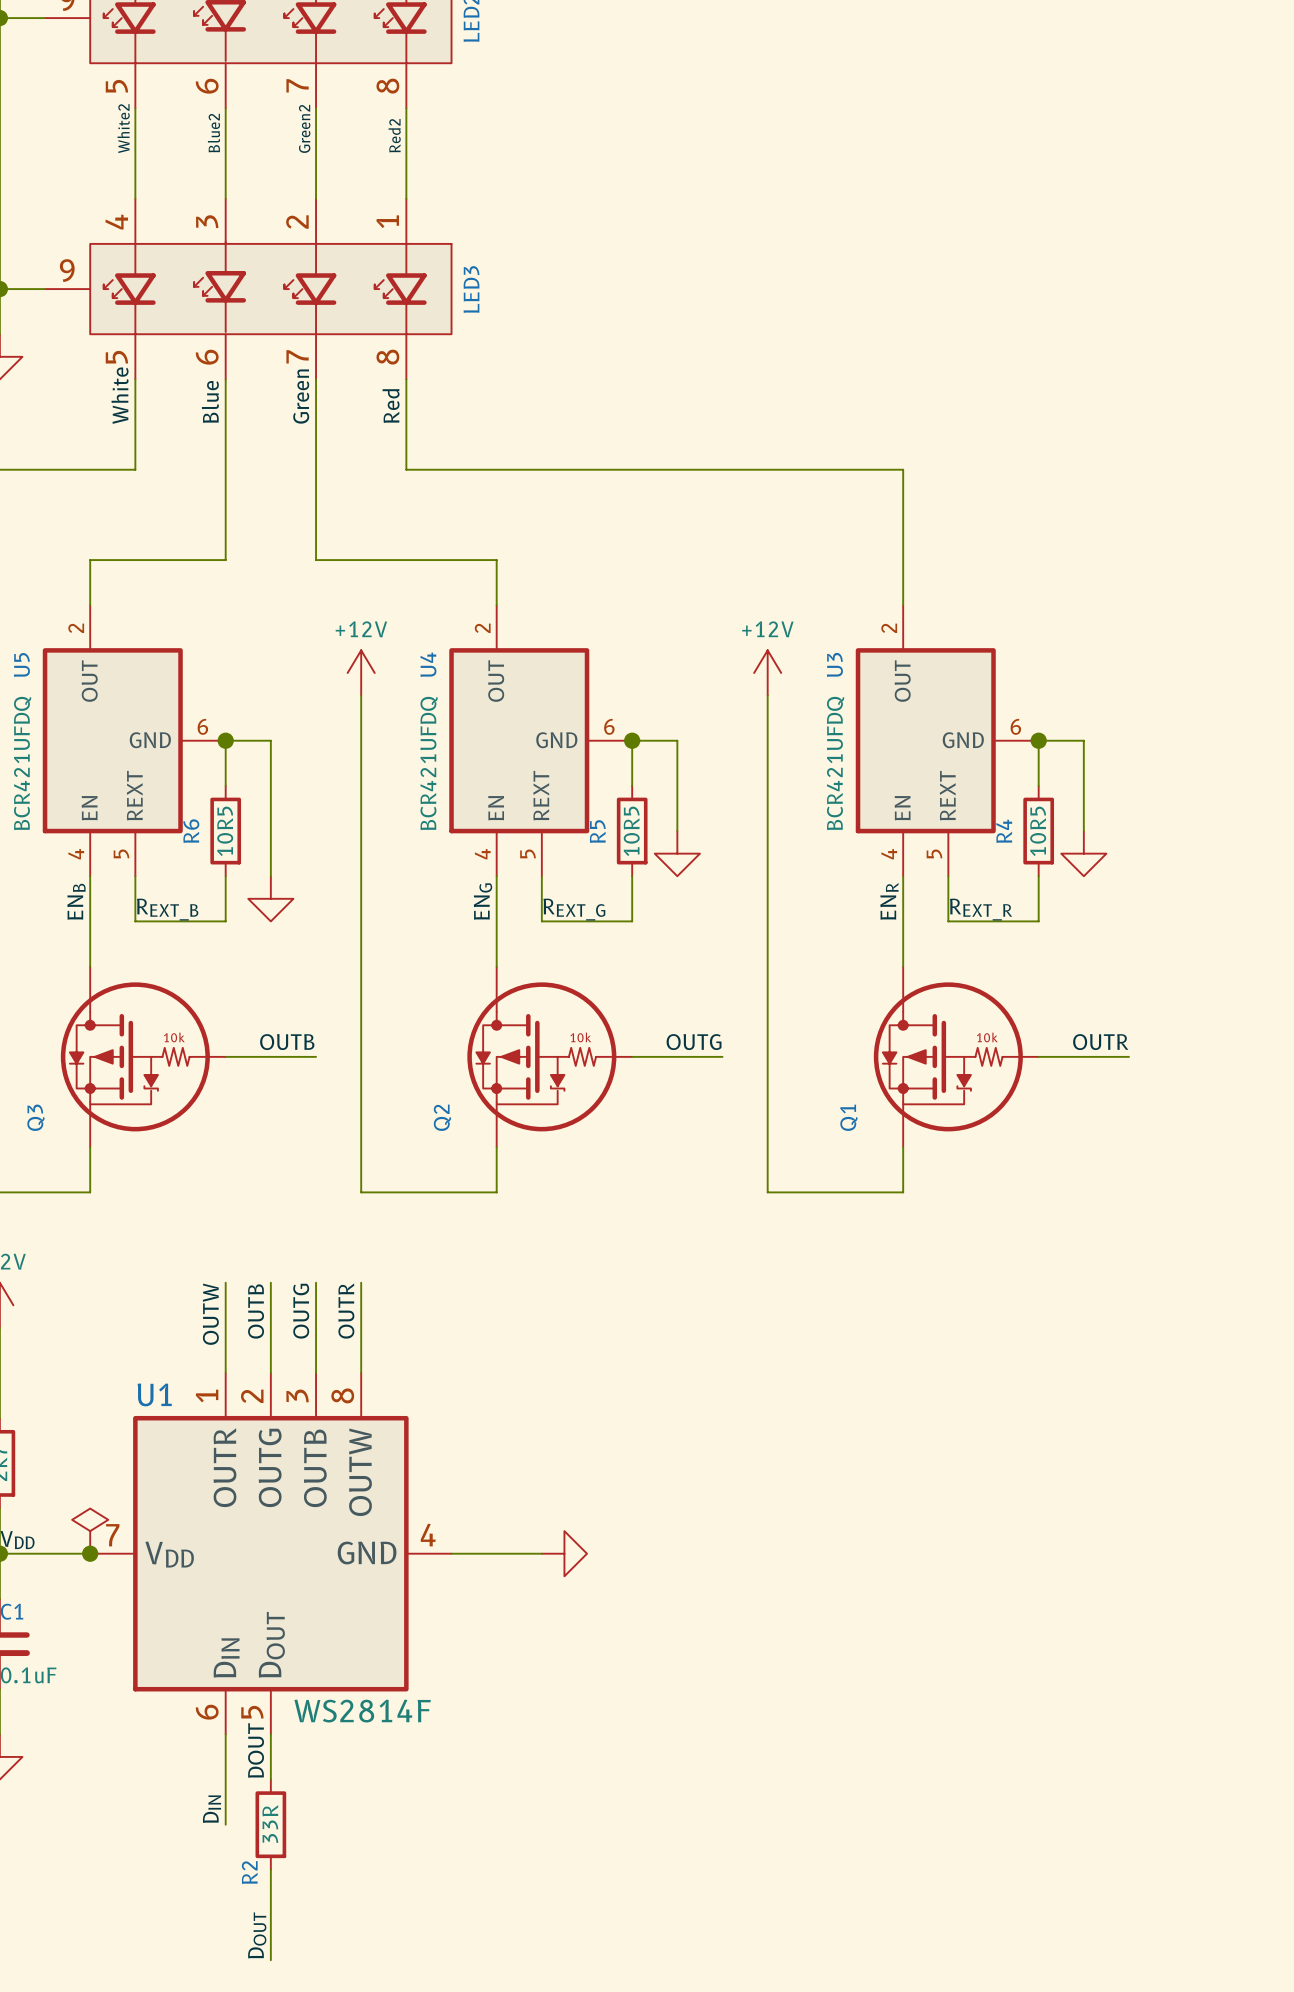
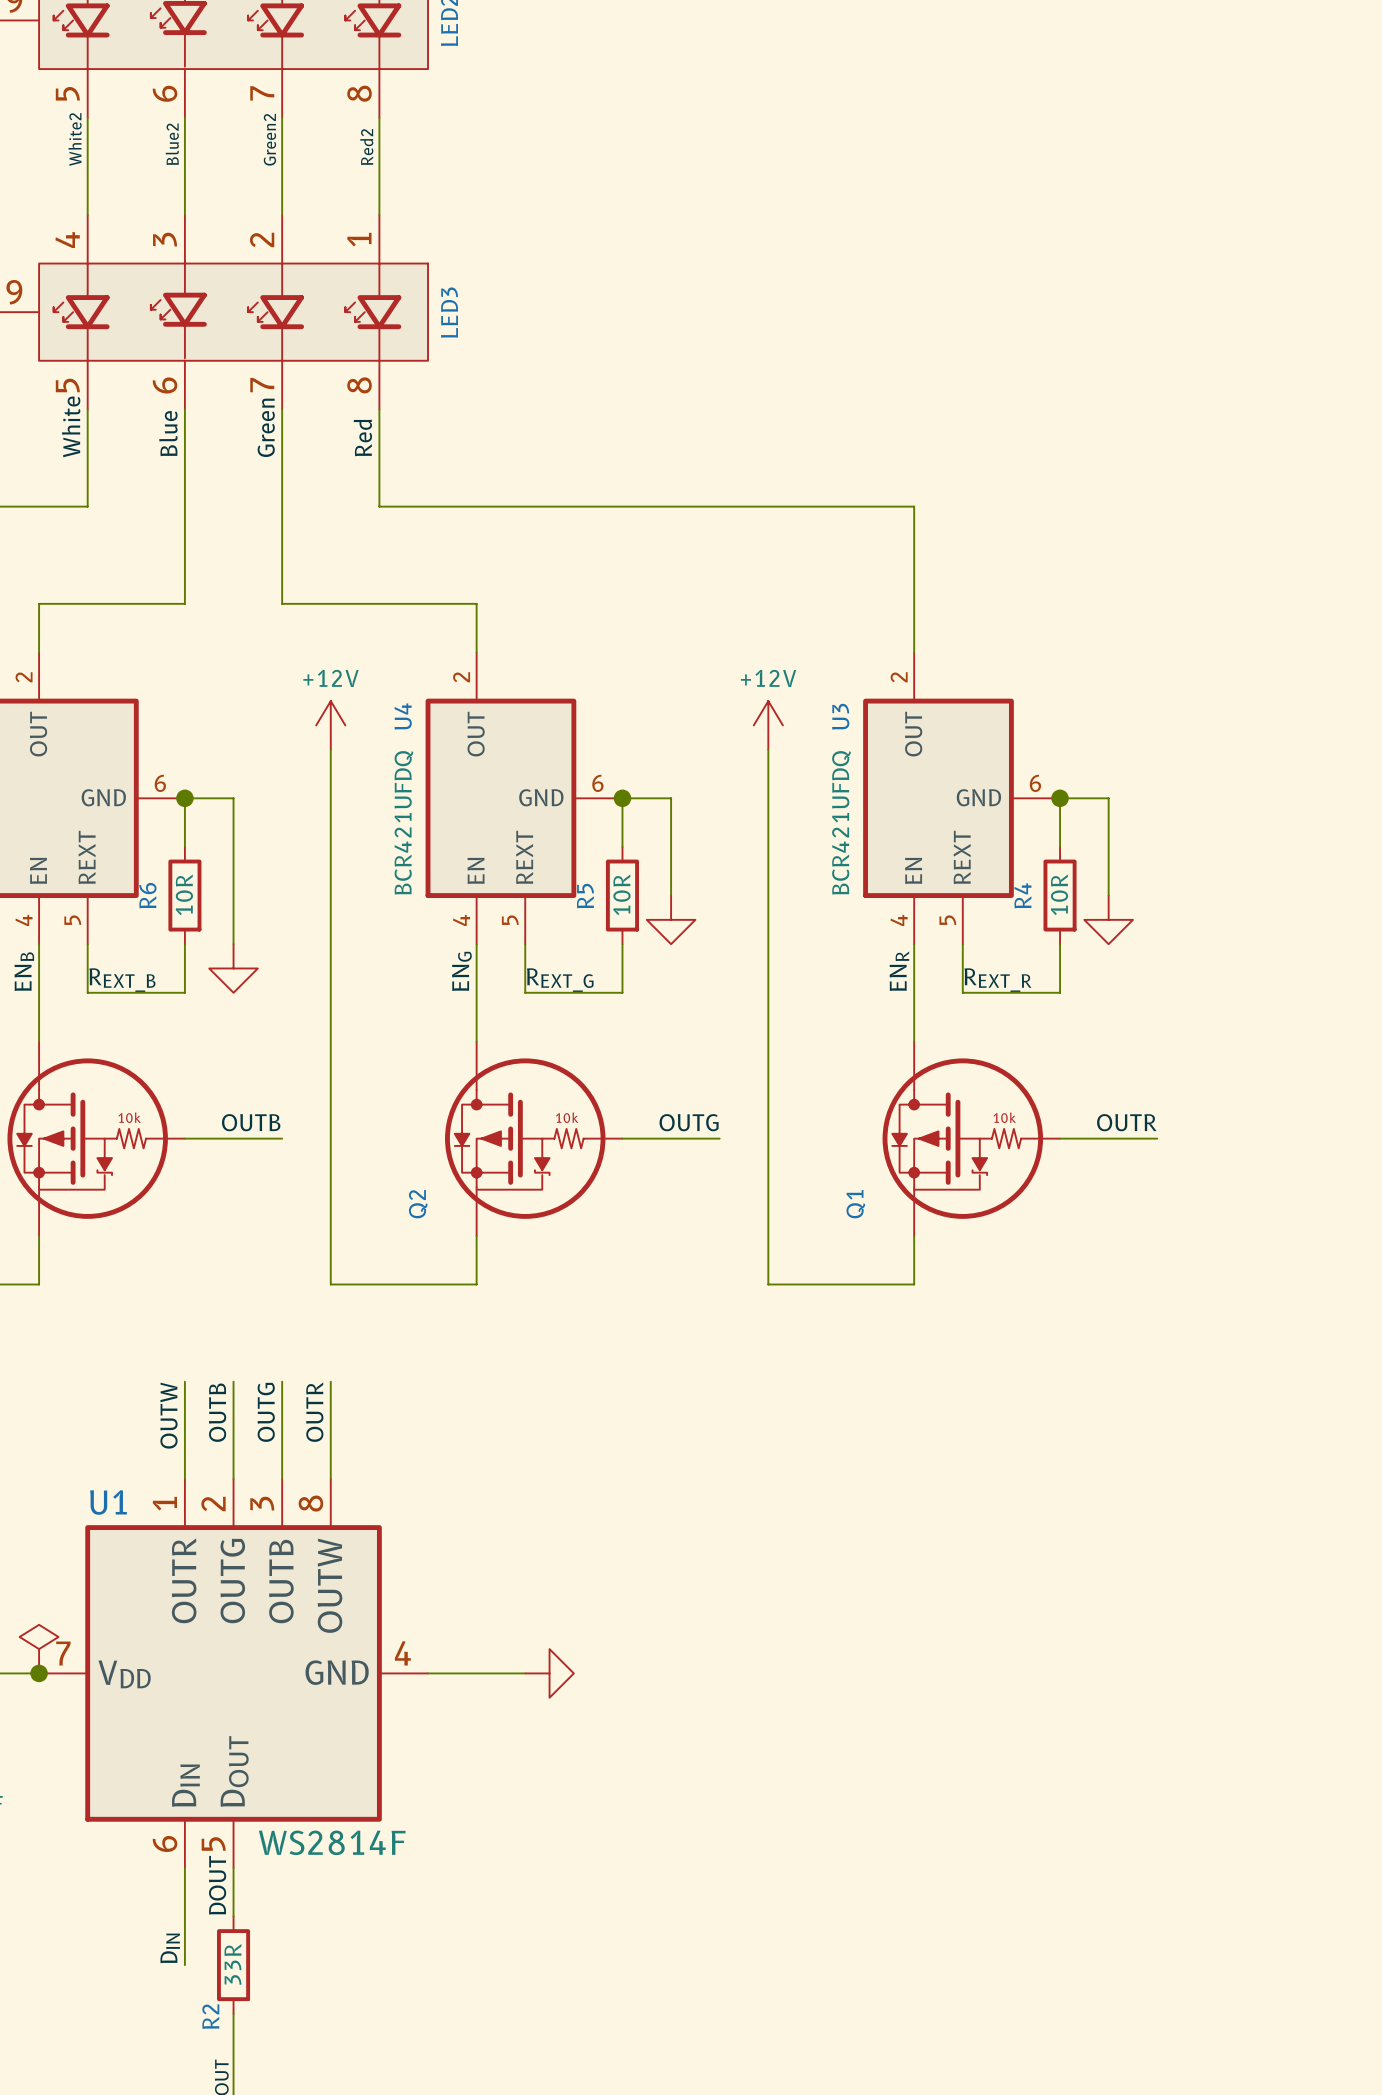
R6 value: 10R5 (225, 831) -> 10R (184, 894)
R5 value: 10R5 (631, 831) -> 10R (621, 894)
R4 value: 10R5 (1038, 831) -> 10R (1059, 894)

